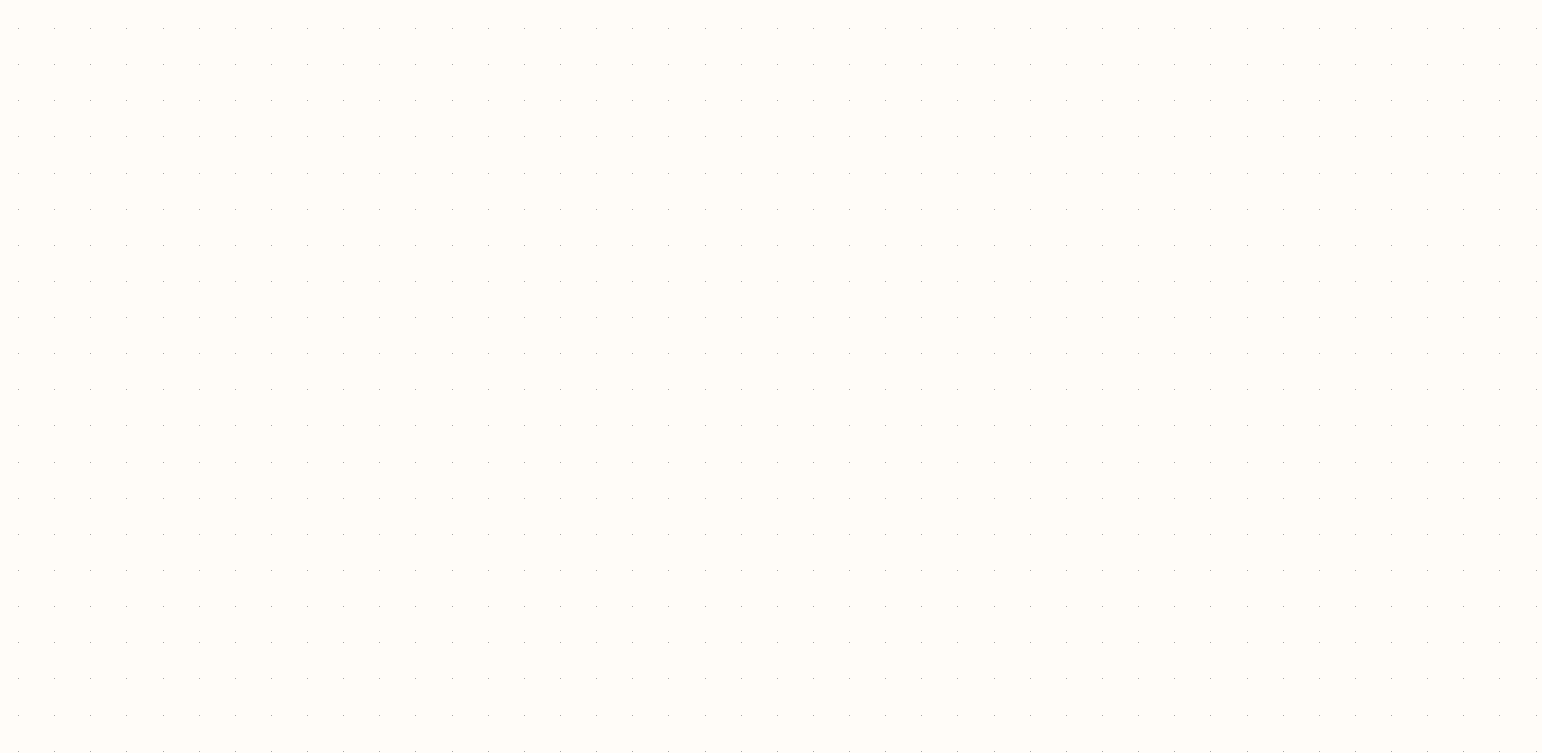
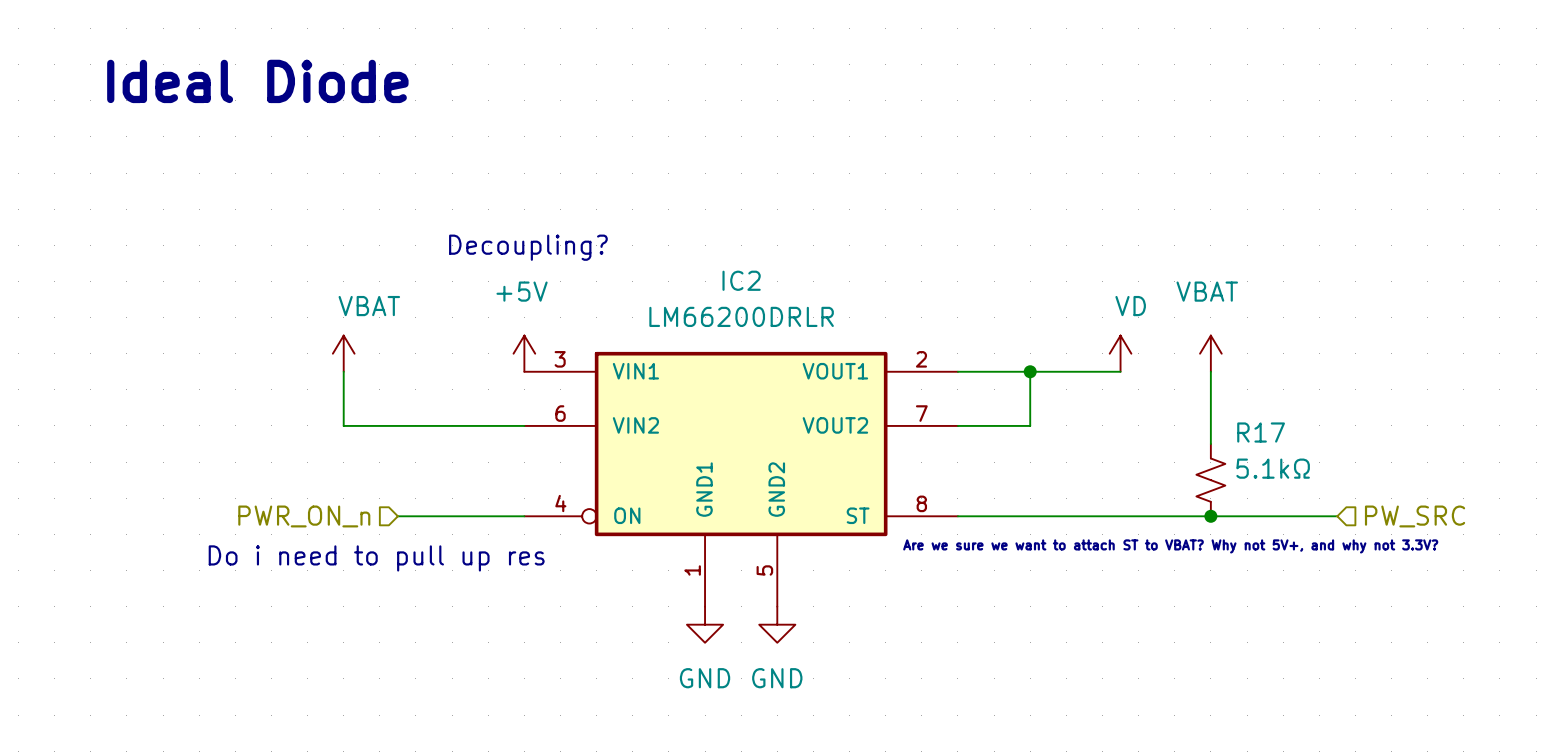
text: none -> Ideal Diode (257, 81)
text: none -> Decoupling? (528, 247)
power symbol: none -> VBAT (343, 353)
power symbol: none -> +5V (524, 353)
power symbol: none -> VD (1120, 353)
power symbol: none -> VBAT (1210, 353)
wire: none -> (343, 371) (343, 425) (524, 425)
wire: none -> (957, 371) (1120, 371)
wire: none -> (1030, 371) (1030, 425) (957, 425)
junction: none -> (1030, 371)
wire: none -> (1210, 371) (1210, 444)
IC2: none -> LM66200DRLR (741, 479)
R17: none -> 5.1kΩ (1210, 480)
hierarchical label: none -> PWR_ON_n (304, 516)
wire: none -> (397, 516) (524, 516)
wire: none -> (957, 516) (1337, 516)
junction: none -> (1210, 516)
hierarchical label: none -> PW_SRC (1415, 516)
text: none -> Are we sure we want to attach ST to VBAT? Why not 5V+, and why not 3.3V? (1170, 546)
text: none -> Do i need to pull up res (376, 558)
power symbol: none -> GND (705, 624)
power symbol: none -> GND (777, 624)

